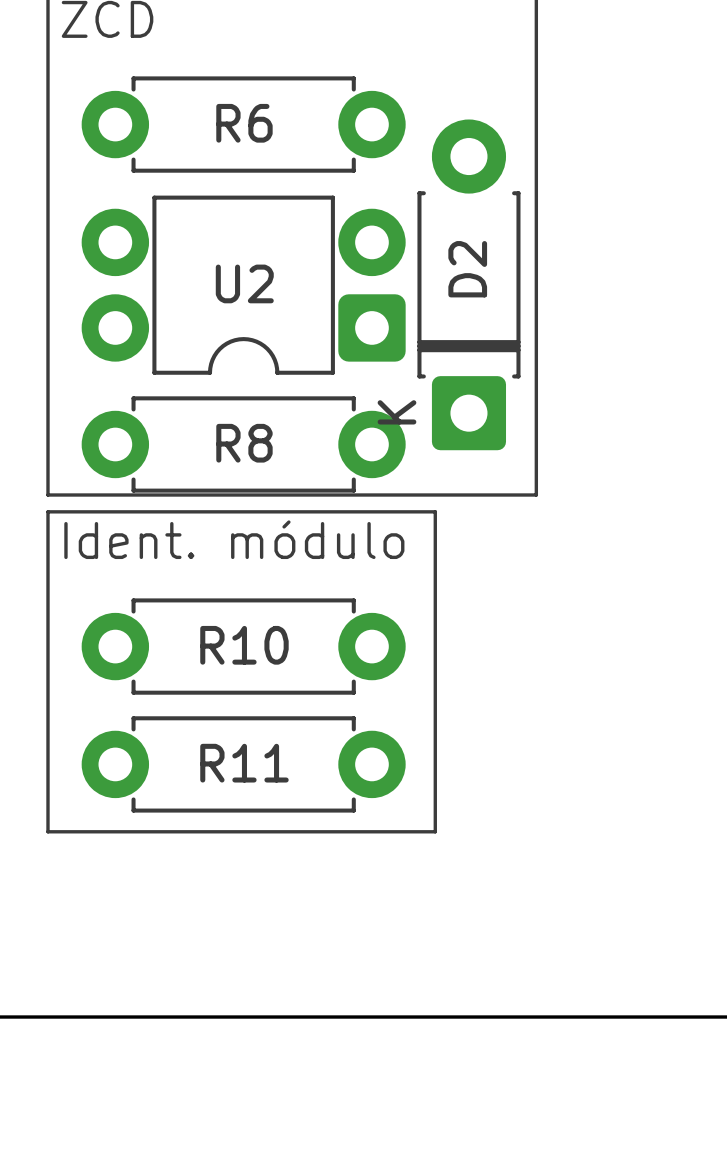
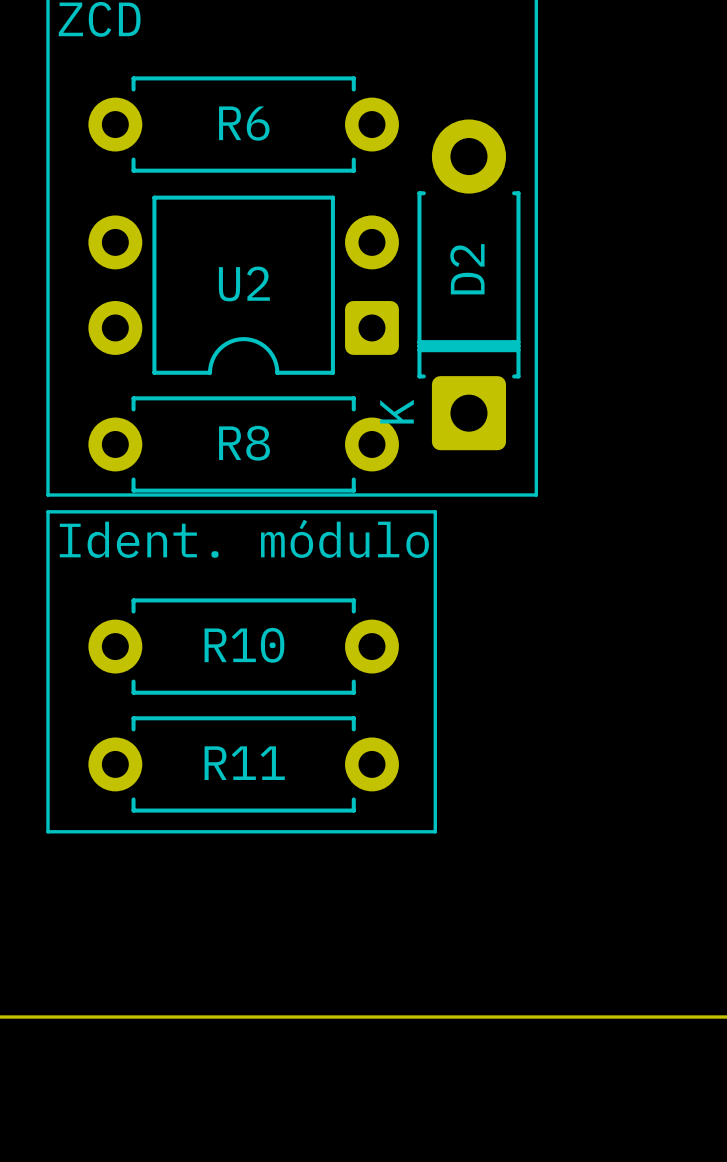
R6 footprint: [81, 76, 406, 173] -> [88, 76, 399, 173]
U2 footprint: [81, 195, 406, 375] -> [88, 195, 399, 375]
R8 footprint: [81, 396, 406, 493] -> [88, 396, 399, 493]
R10 footprint: [81, 598, 406, 695] -> [88, 598, 399, 695]
R11 footprint: [81, 716, 406, 813] -> [88, 716, 399, 813]

